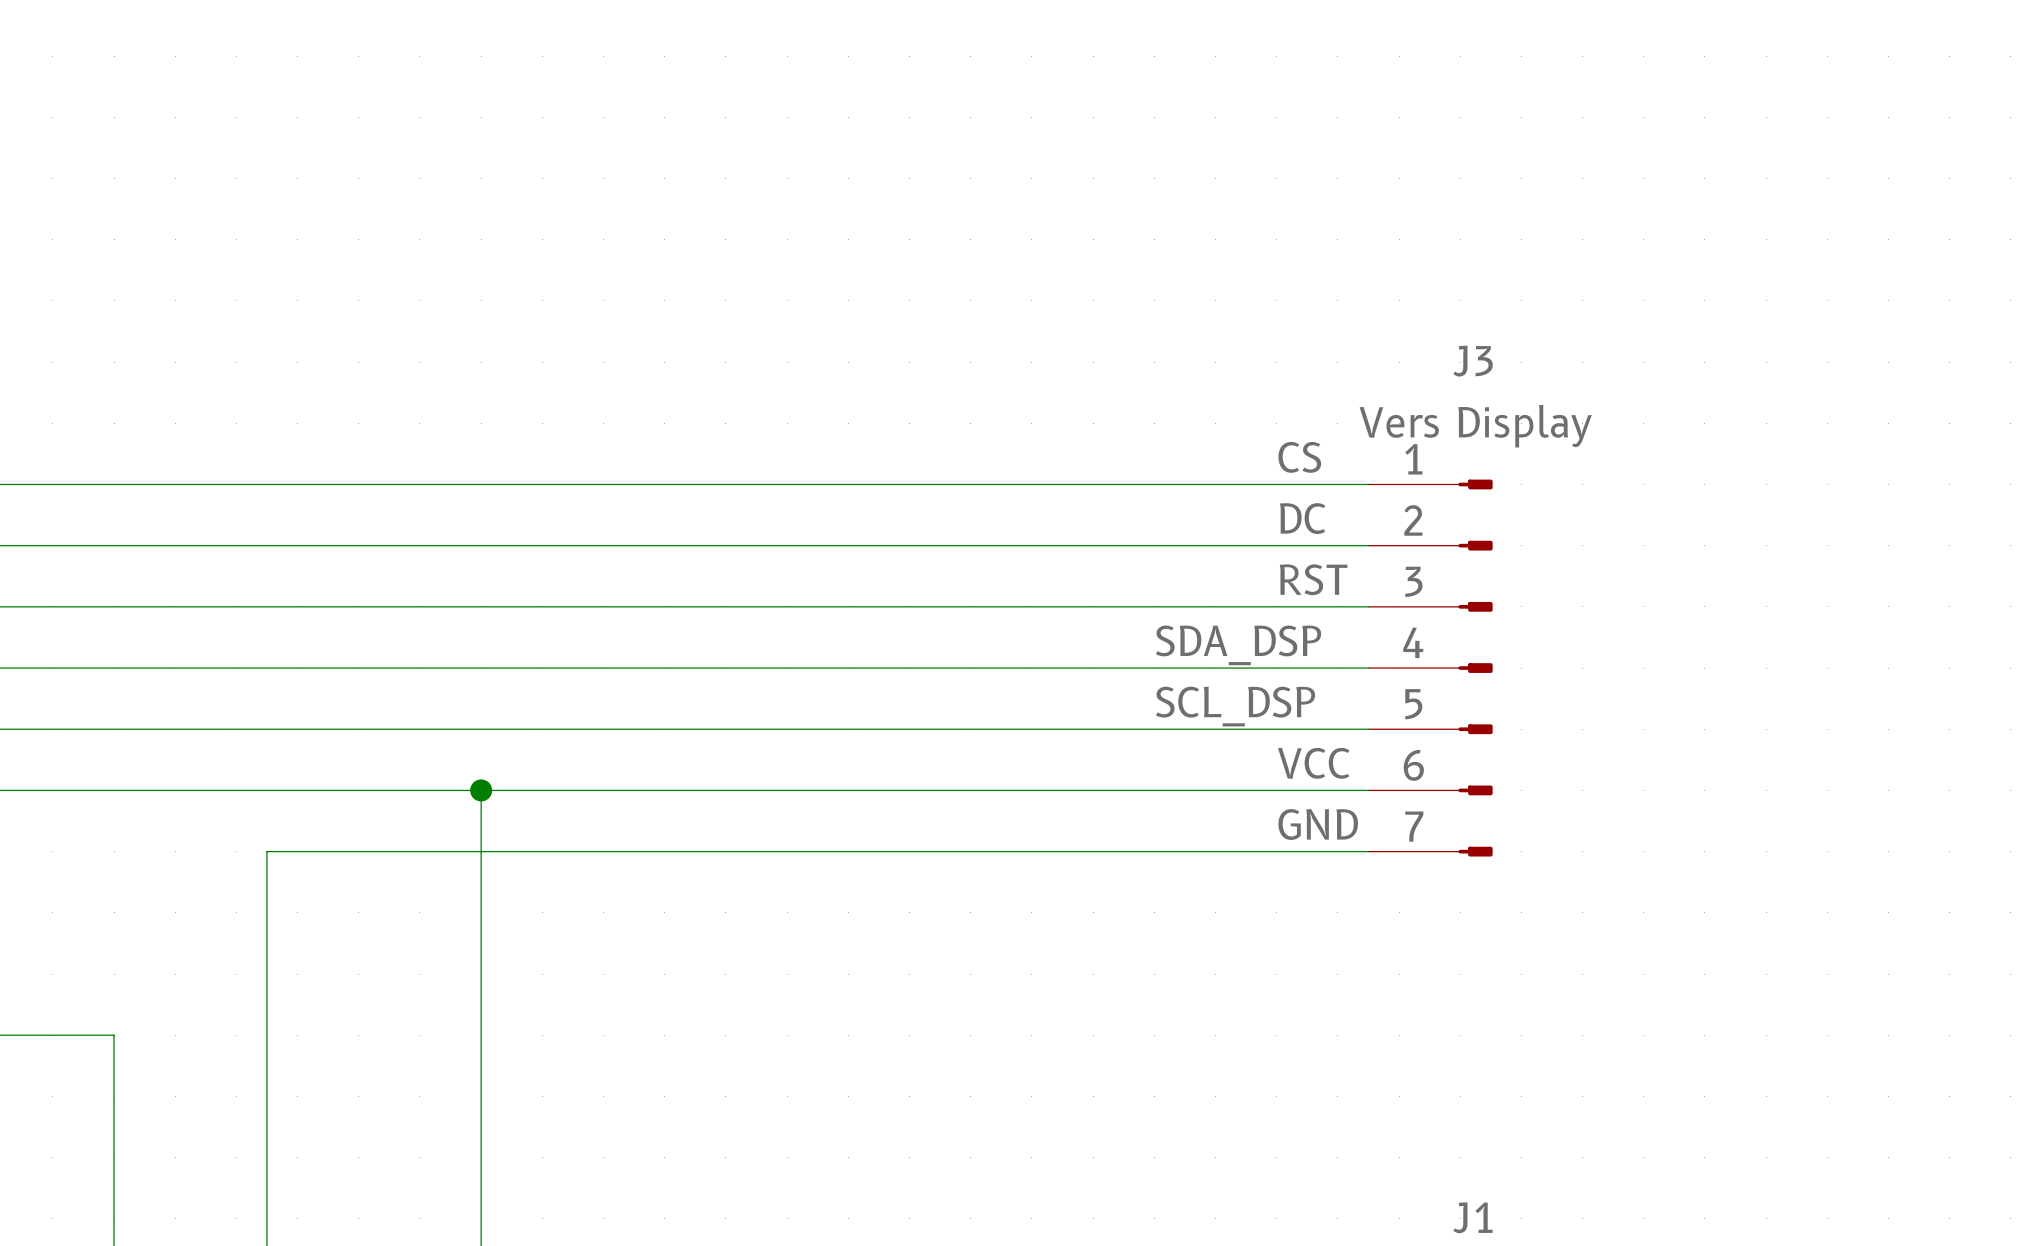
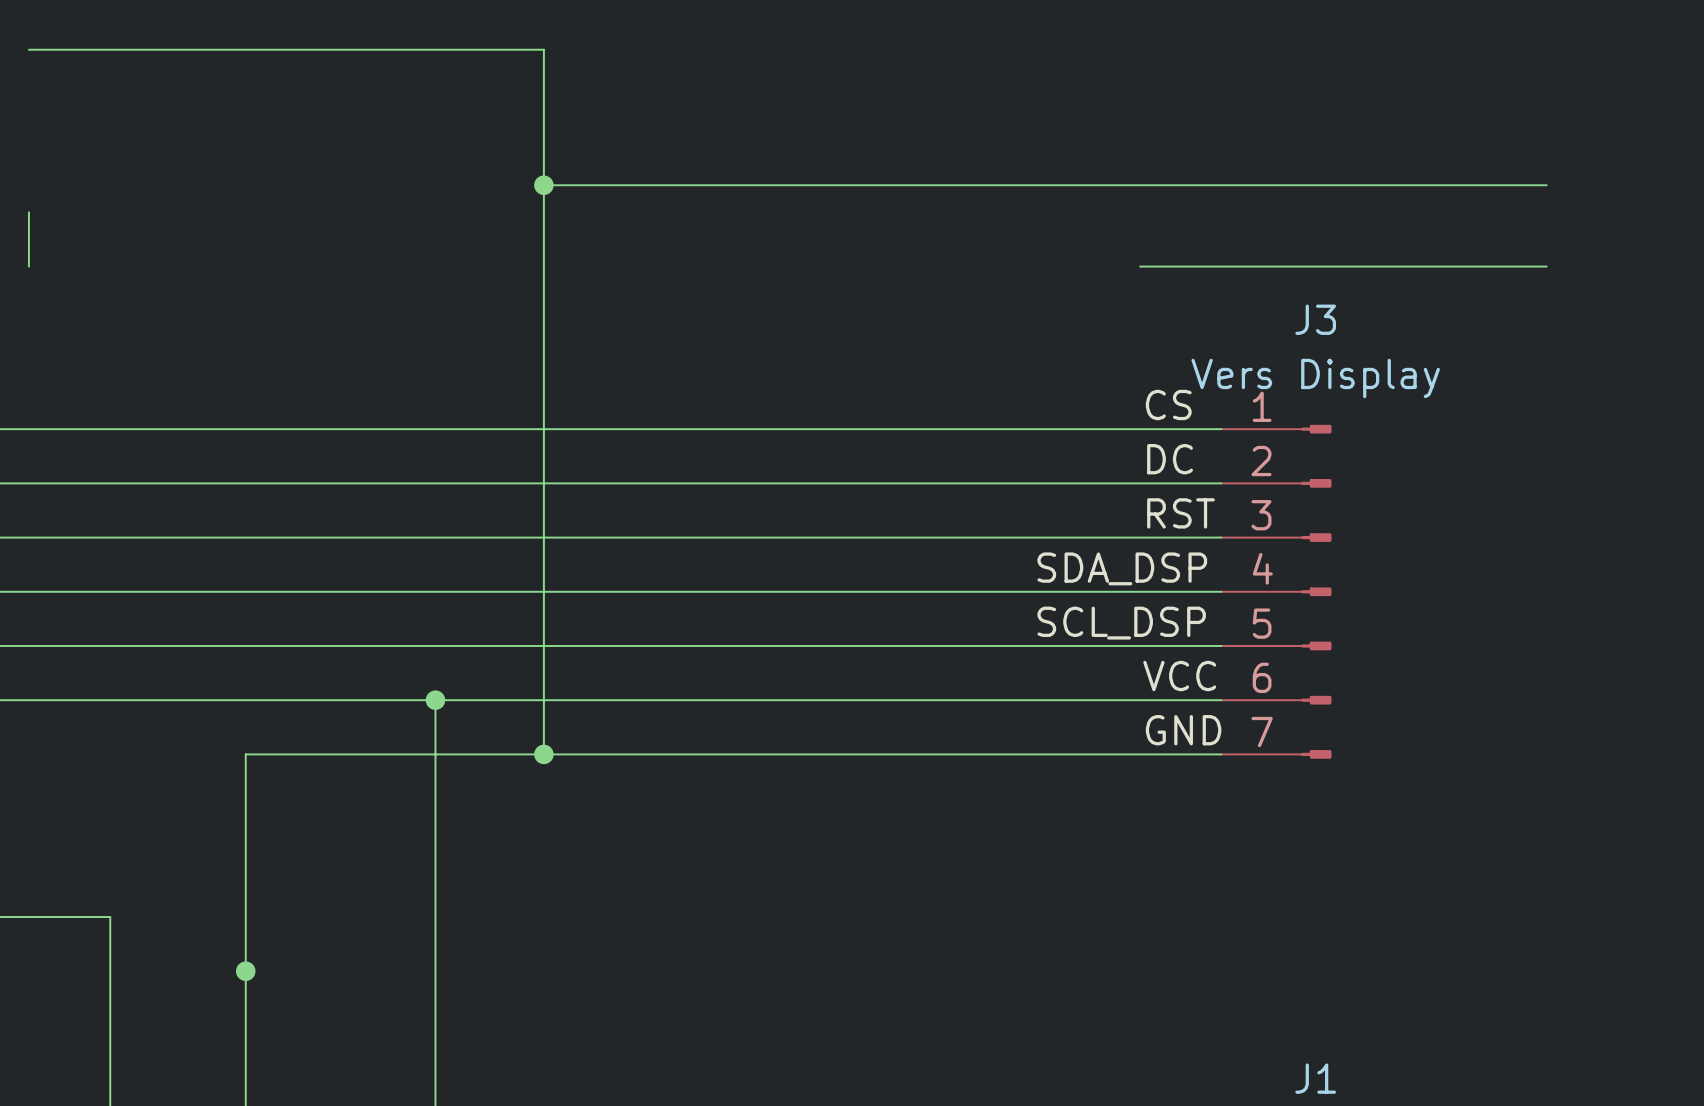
wire: none -> (28, 49) (543, 49) (543, 754)
wire: none -> (543, 185) (1546, 185)
junction: none -> (543, 185)
wire: none -> (28, 212) (28, 266)
wire: none -> (1140, 266) (1546, 266)
junction: none -> (543, 754)
junction: none -> (245, 971)

